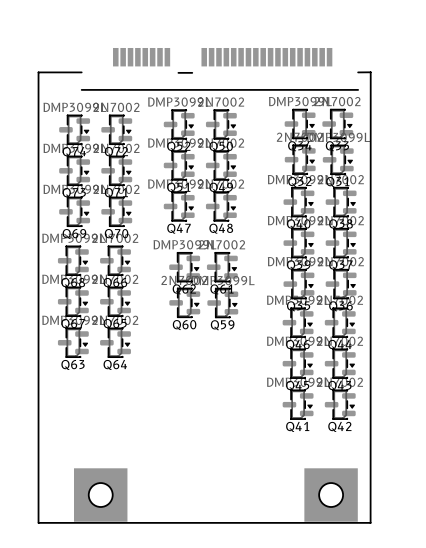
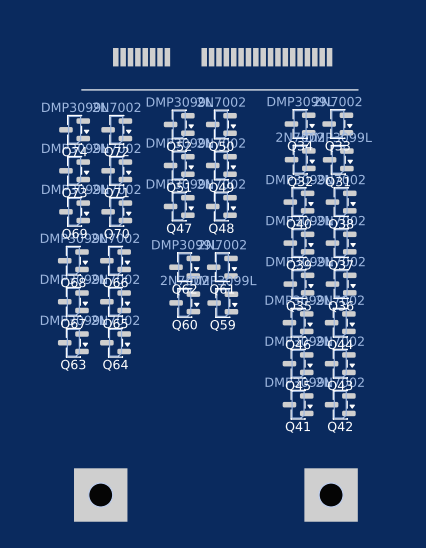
board edge: (81, 72) (38, 72) (38, 522) -> none
board edge: (192, 72) (178, 72) -> none
board edge: (358, 72) (370, 72) (370, 522) (38, 522) -> none

